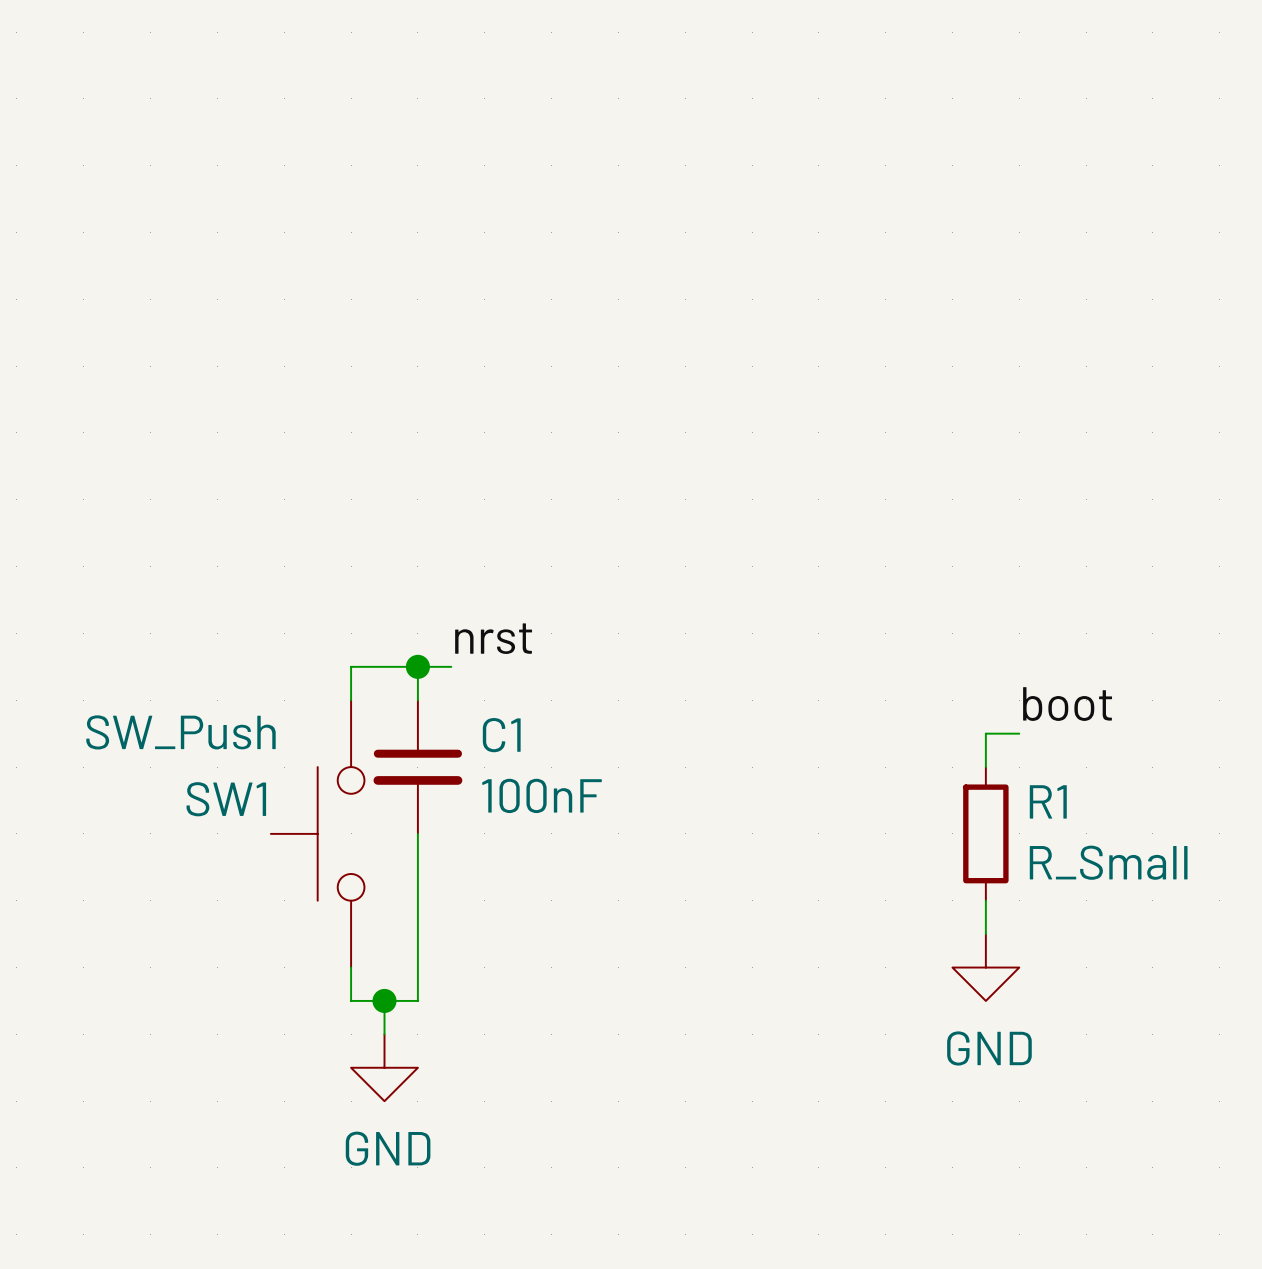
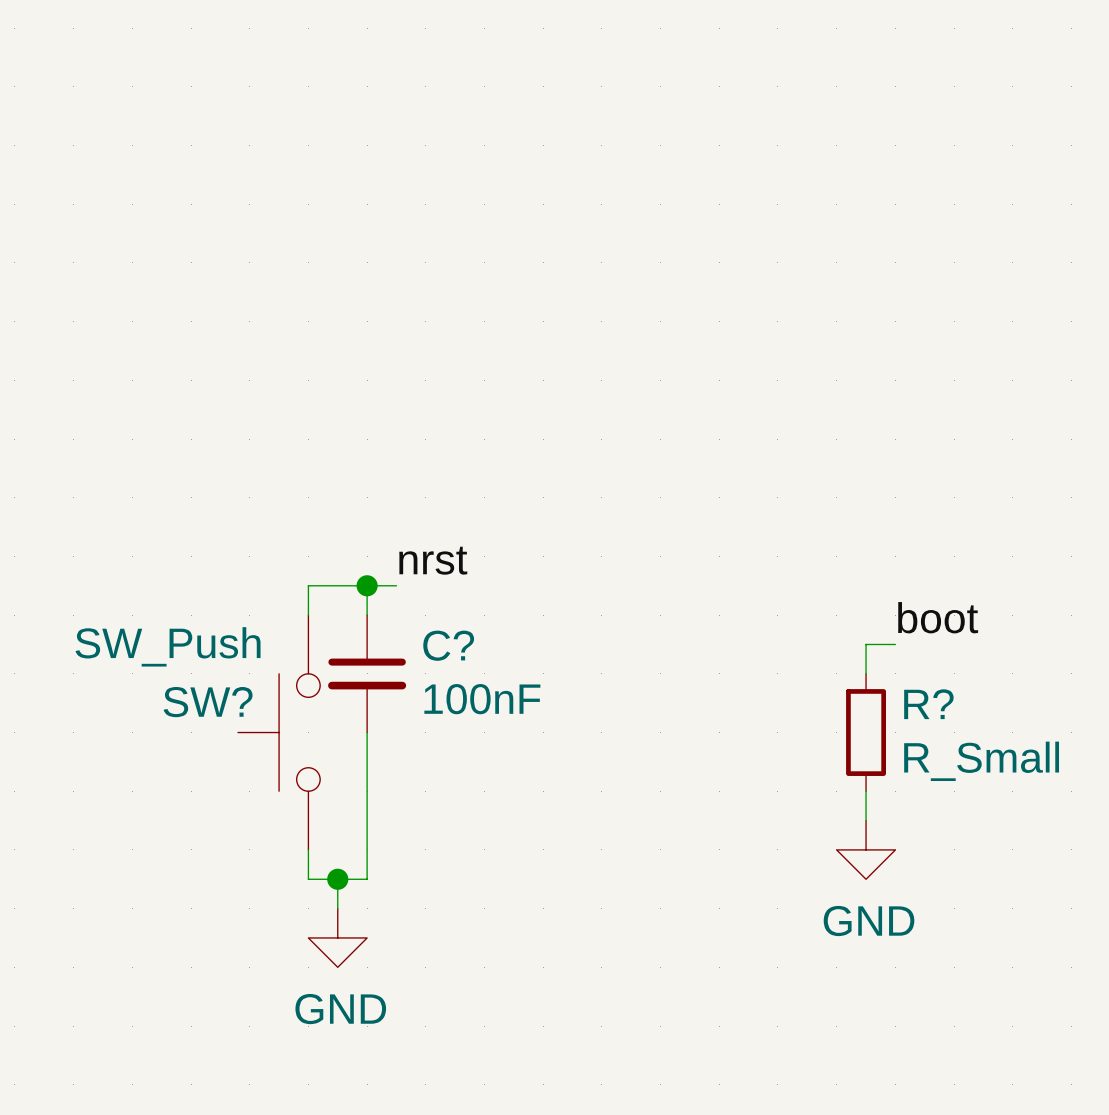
C1 name: C1 (501, 735) -> C? (448, 645)
SW1 name: SW1 (226, 799) -> SW? (208, 702)
R1 name: R1 (1048, 801) -> R? (928, 704)

